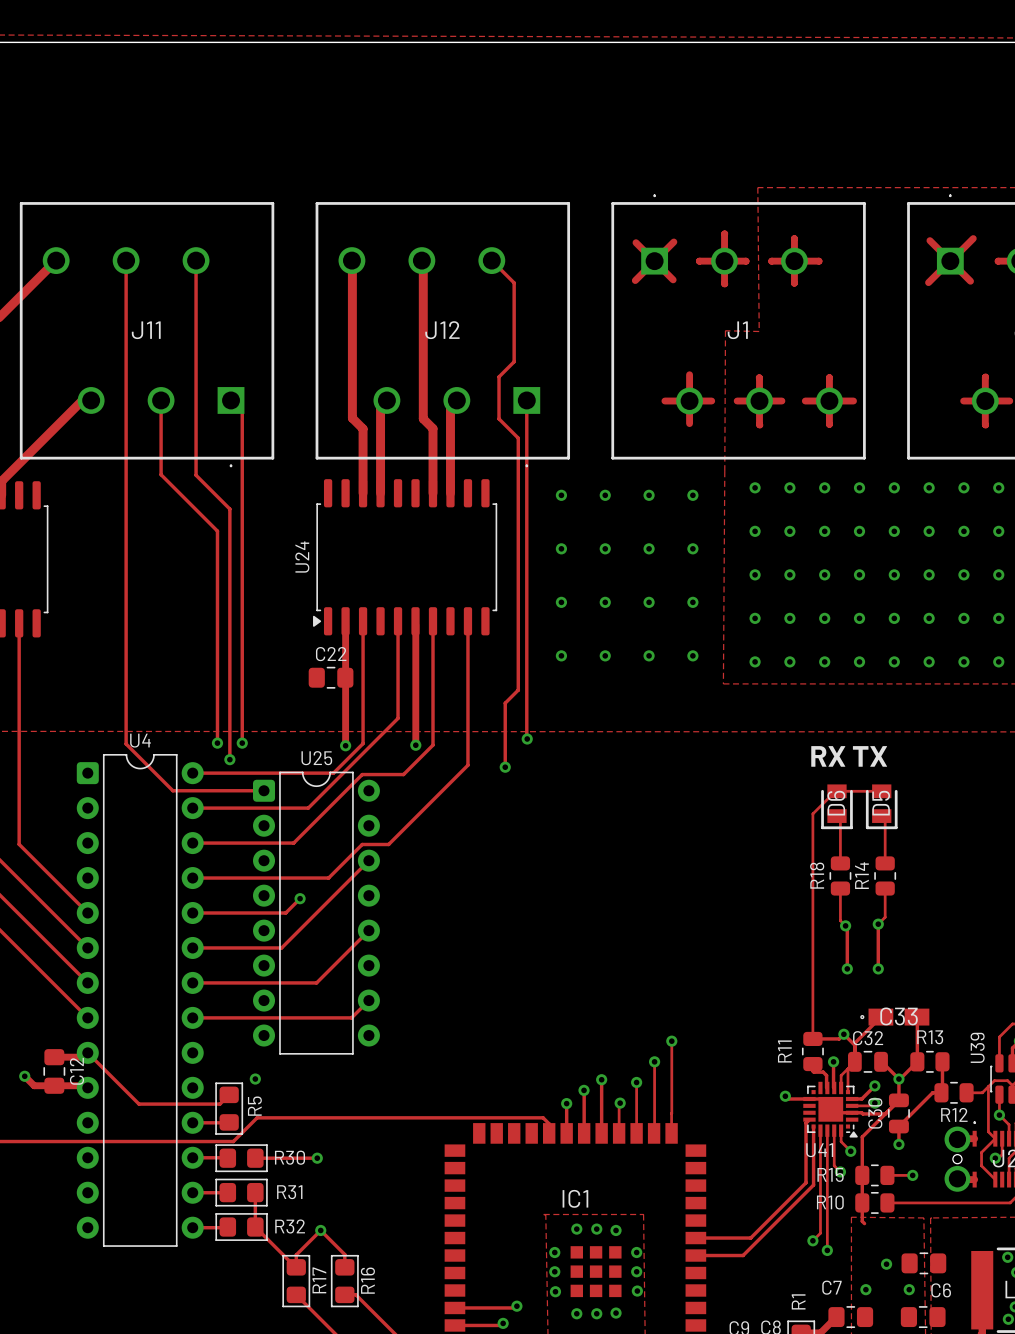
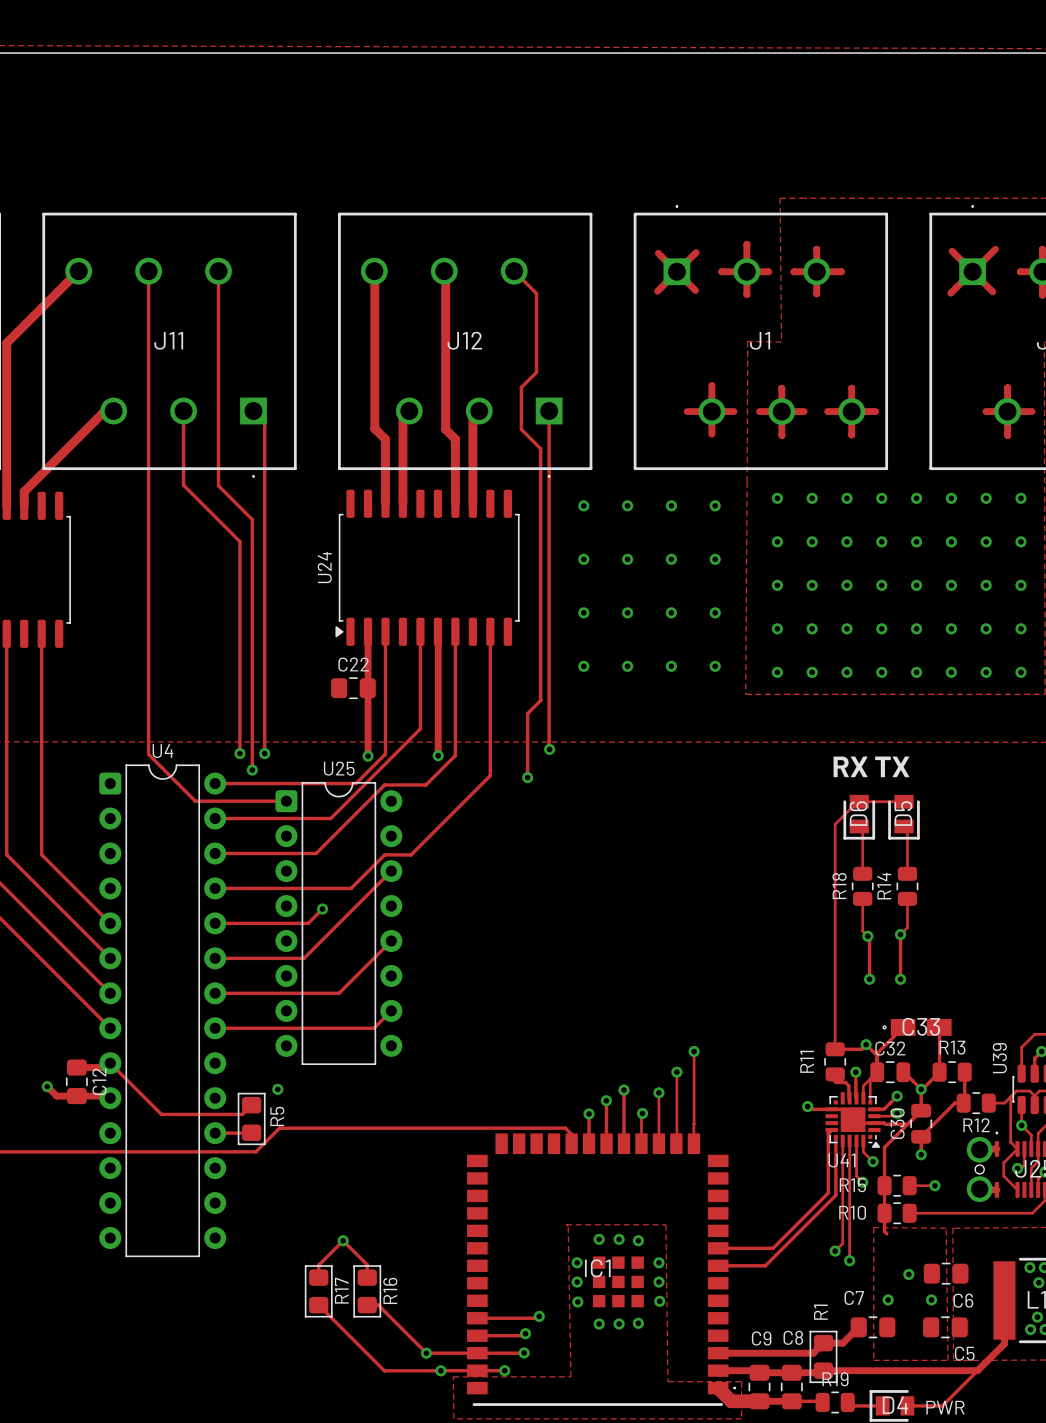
track: (192, 1157) (227, 1158) -> none
R30: (241, 1158) -> none
track: (255, 1158) (317, 1158) -> none
via: (317, 1158) -> none
track: (192, 1192) (227, 1192) -> none
R31: (241, 1192) -> none
track: (255, 1192) (255, 1227) (296, 1267) -> none
IC1 name position: IC1 (575, 1198) -> IC1 (597, 1268)
track: (227, 1227) (192, 1227) -> none
R32: (241, 1227) -> none

